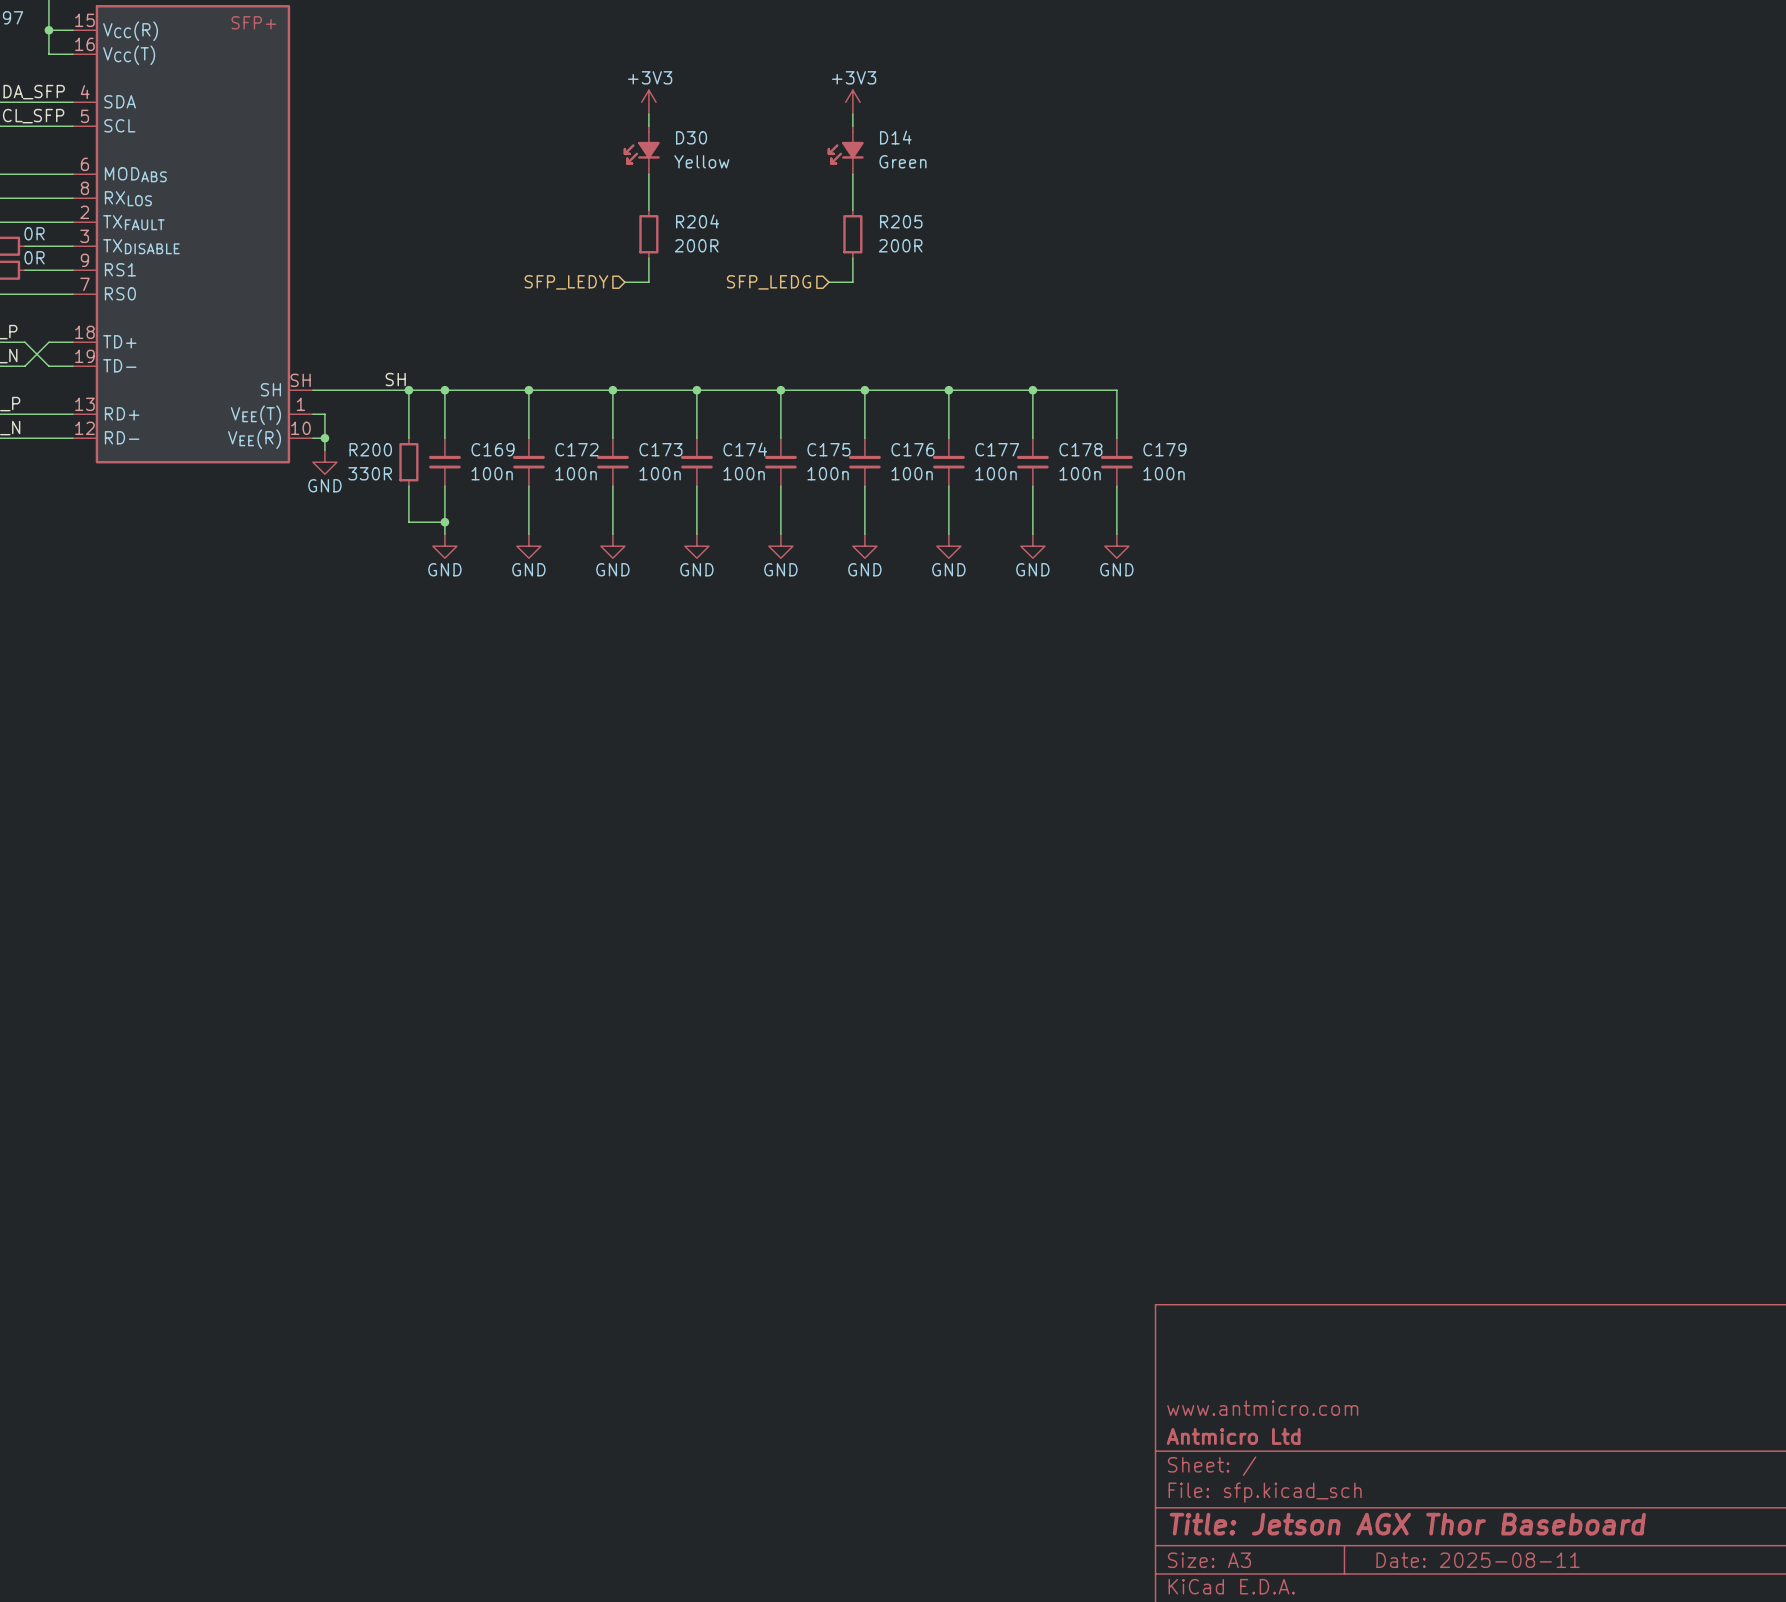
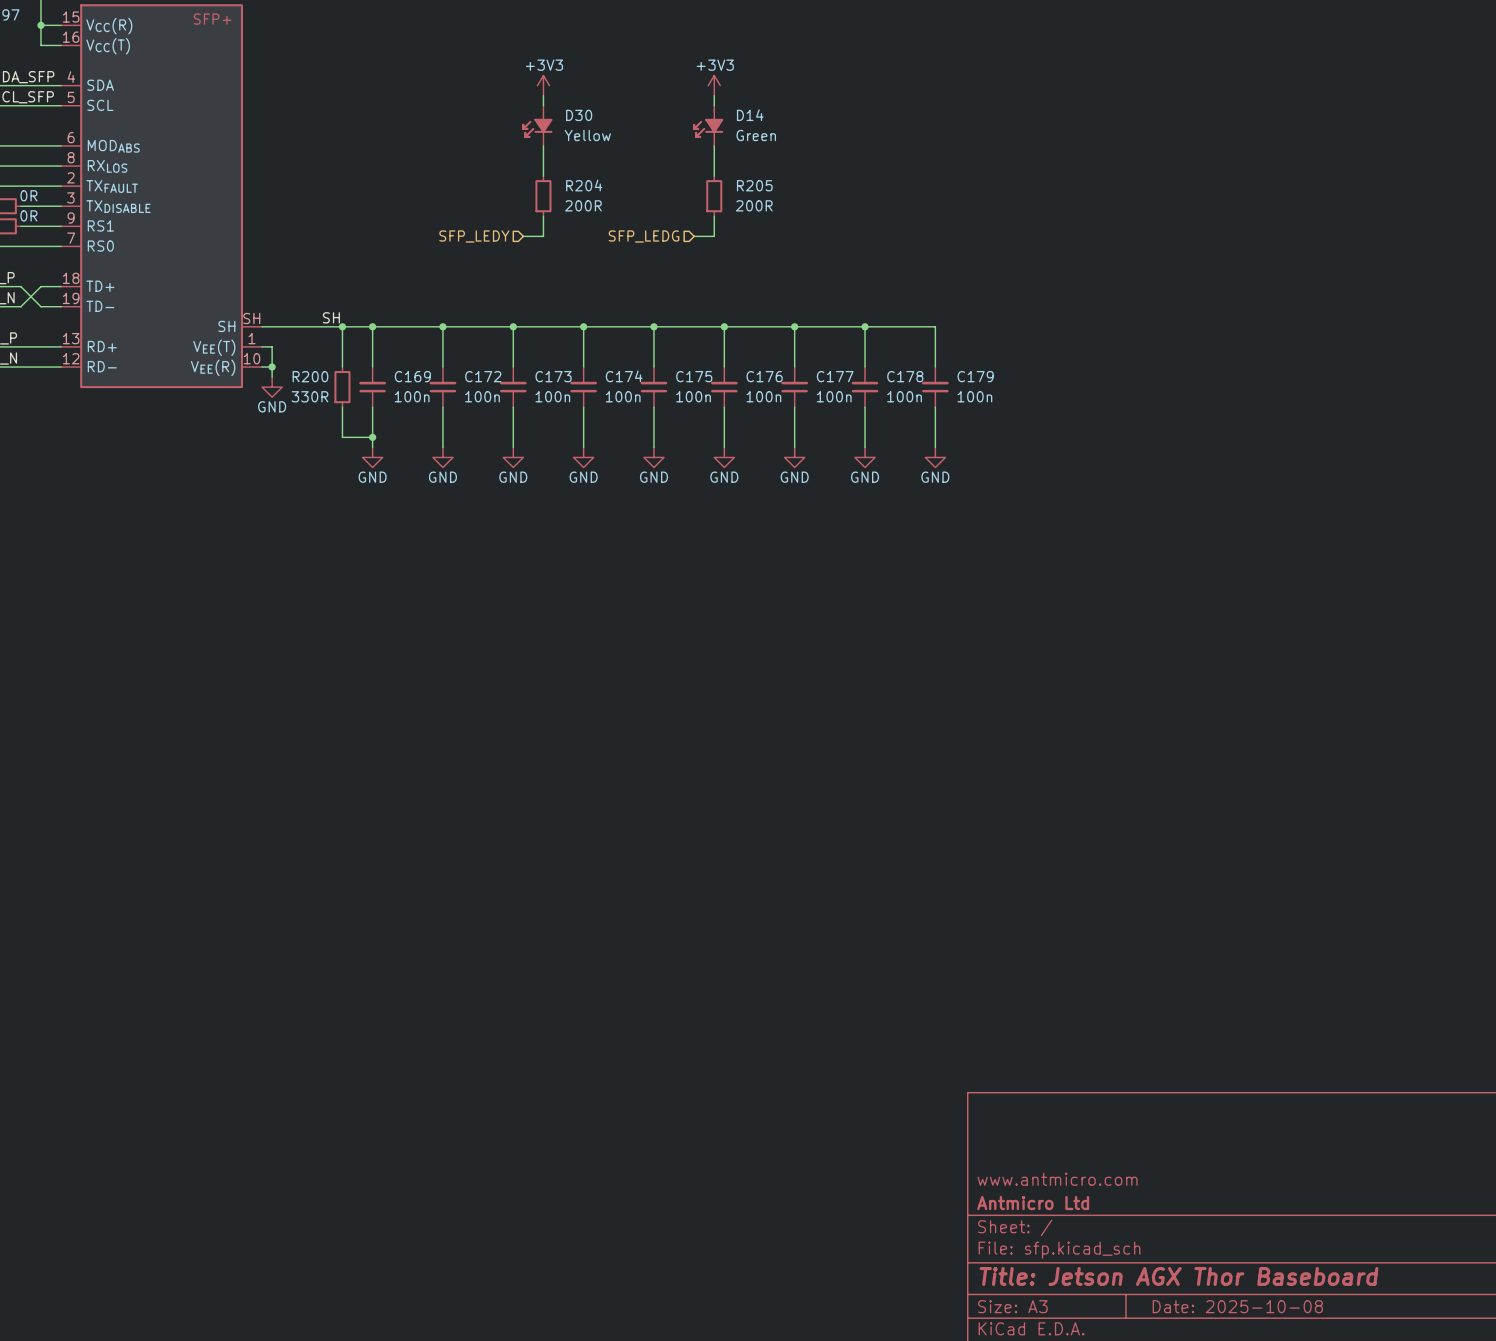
title block: Date: 2025-08-11 (1478, 1560) -> Date: 2025-10-08 (1237, 1306)

